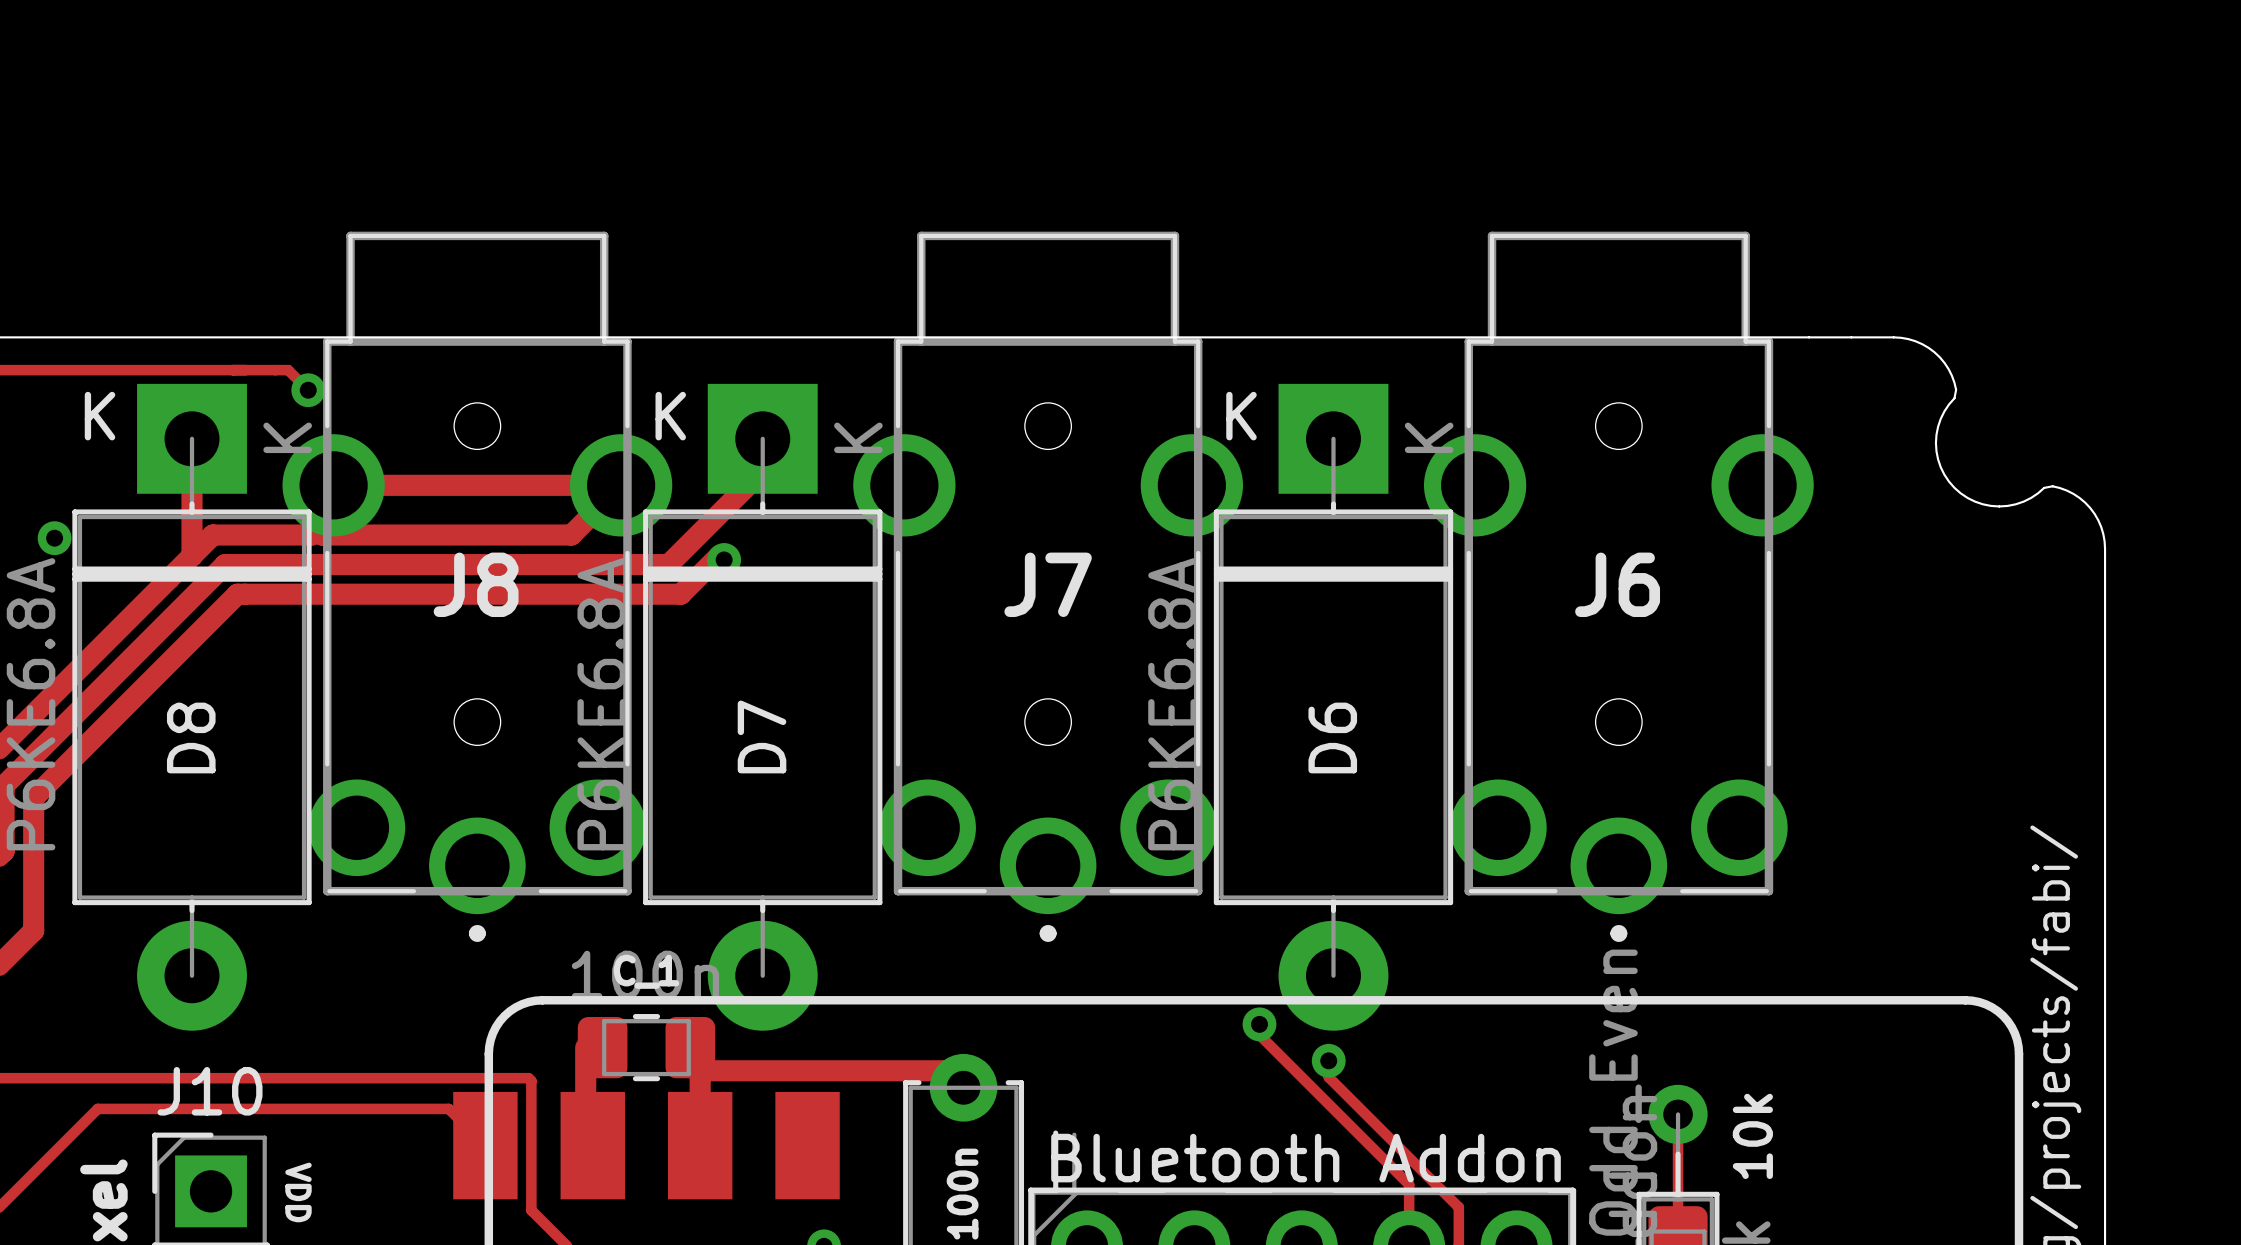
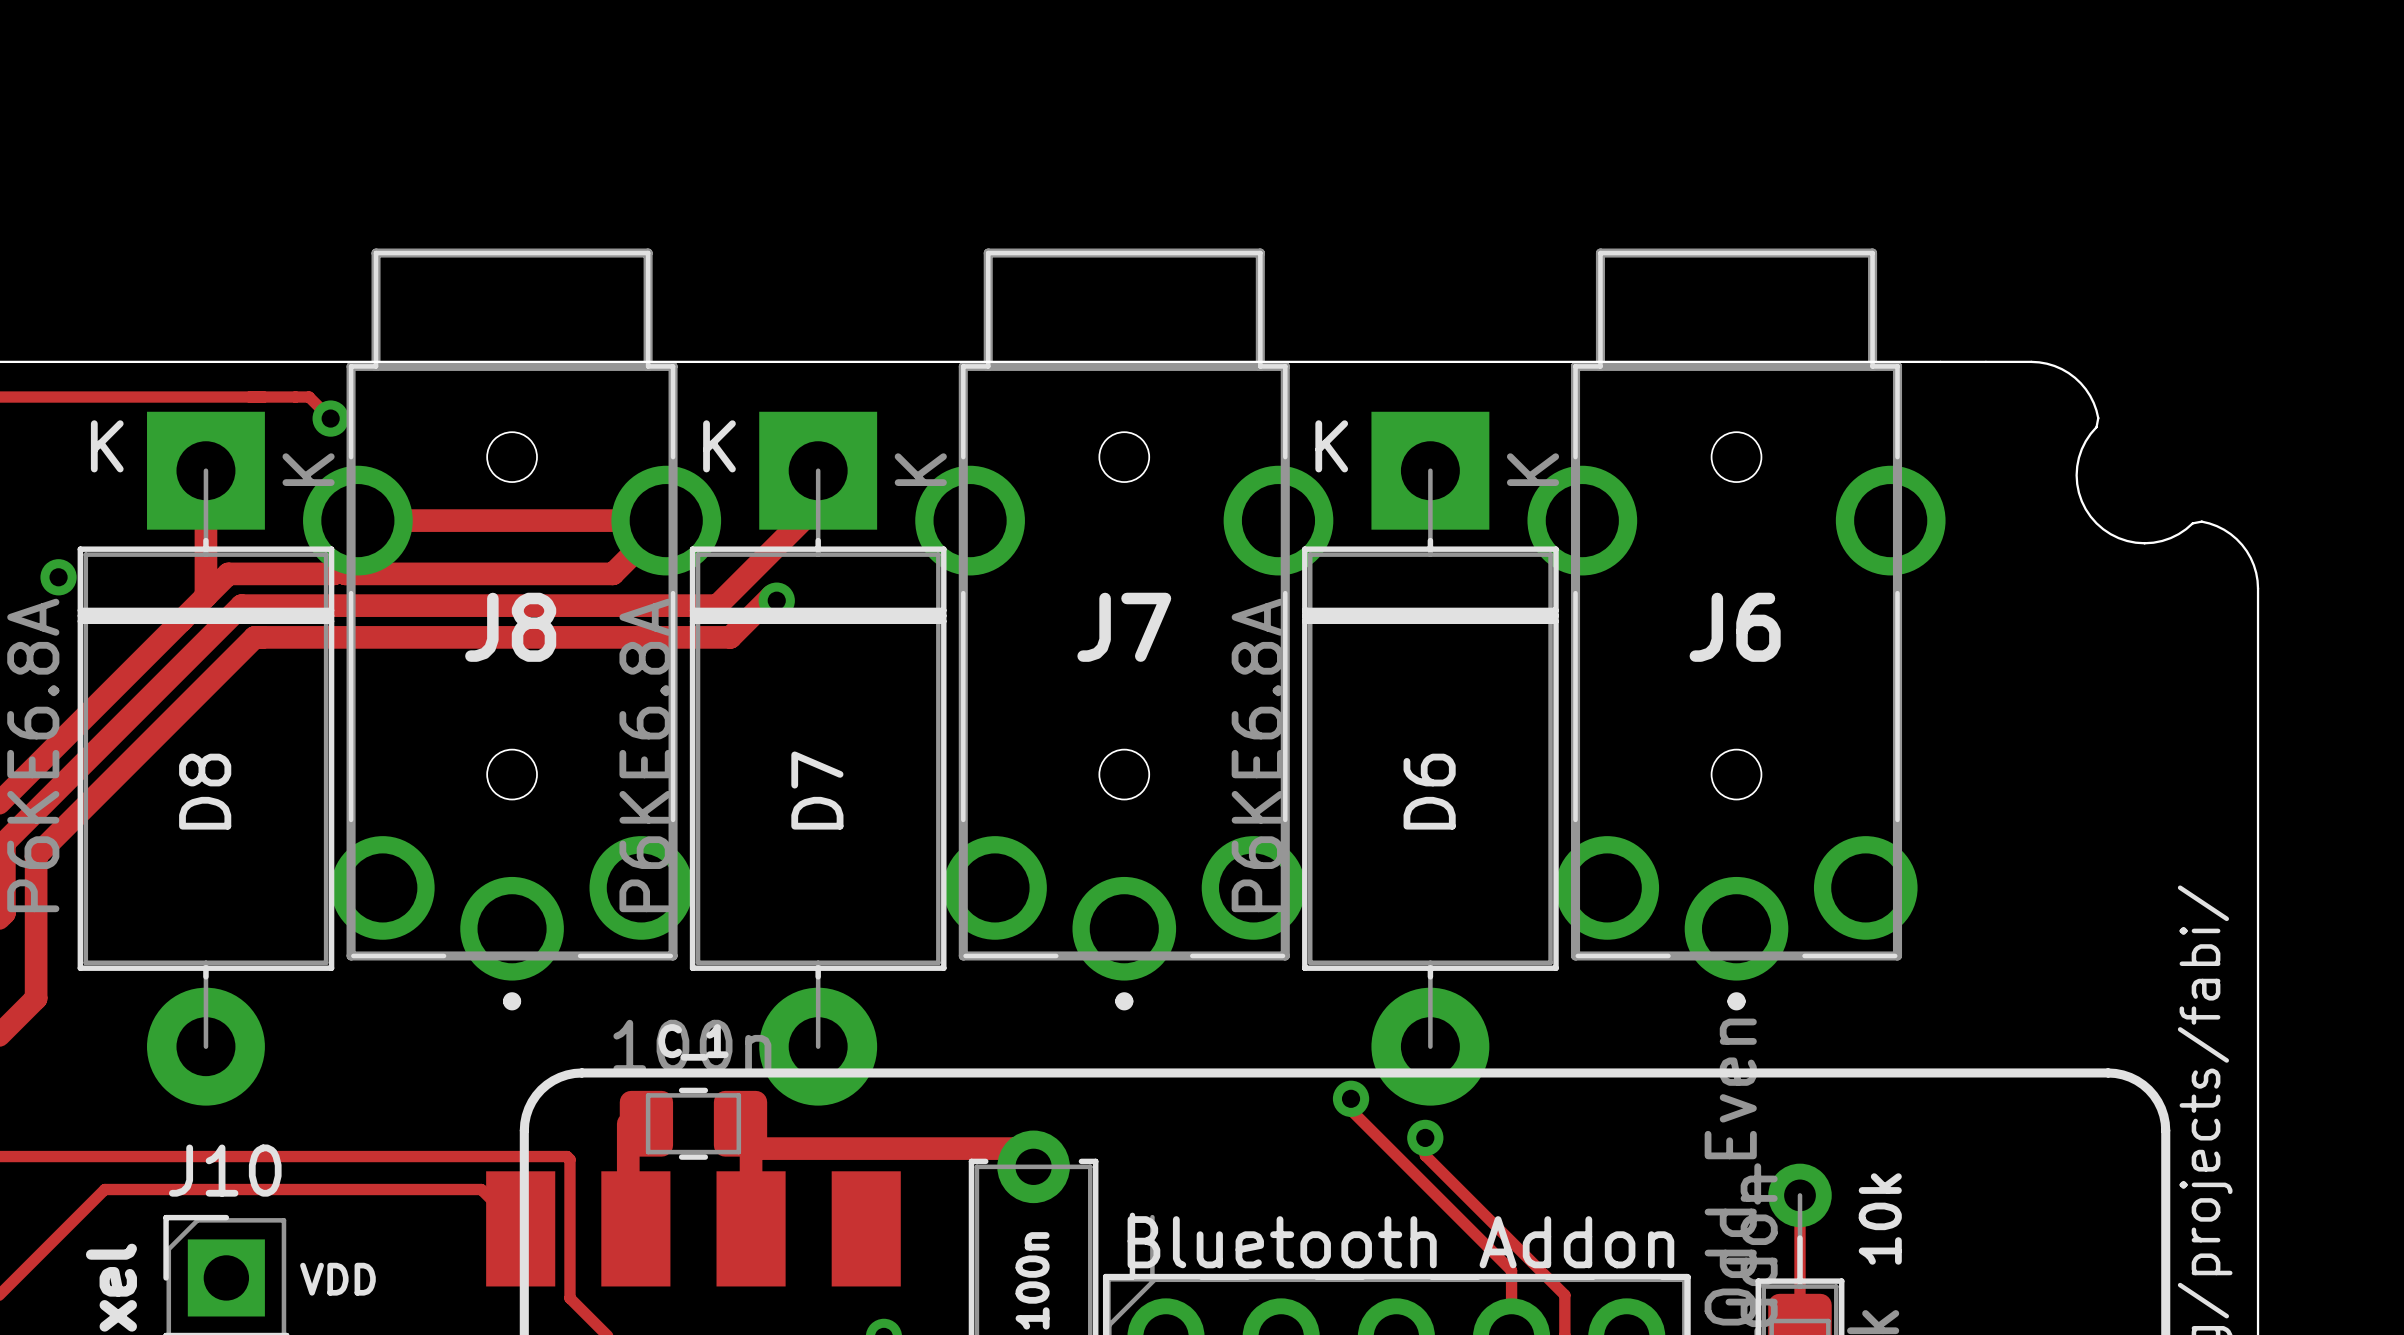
text rotation: 0° (298, 1192) -> 90° counterclockwise (337, 1279)

